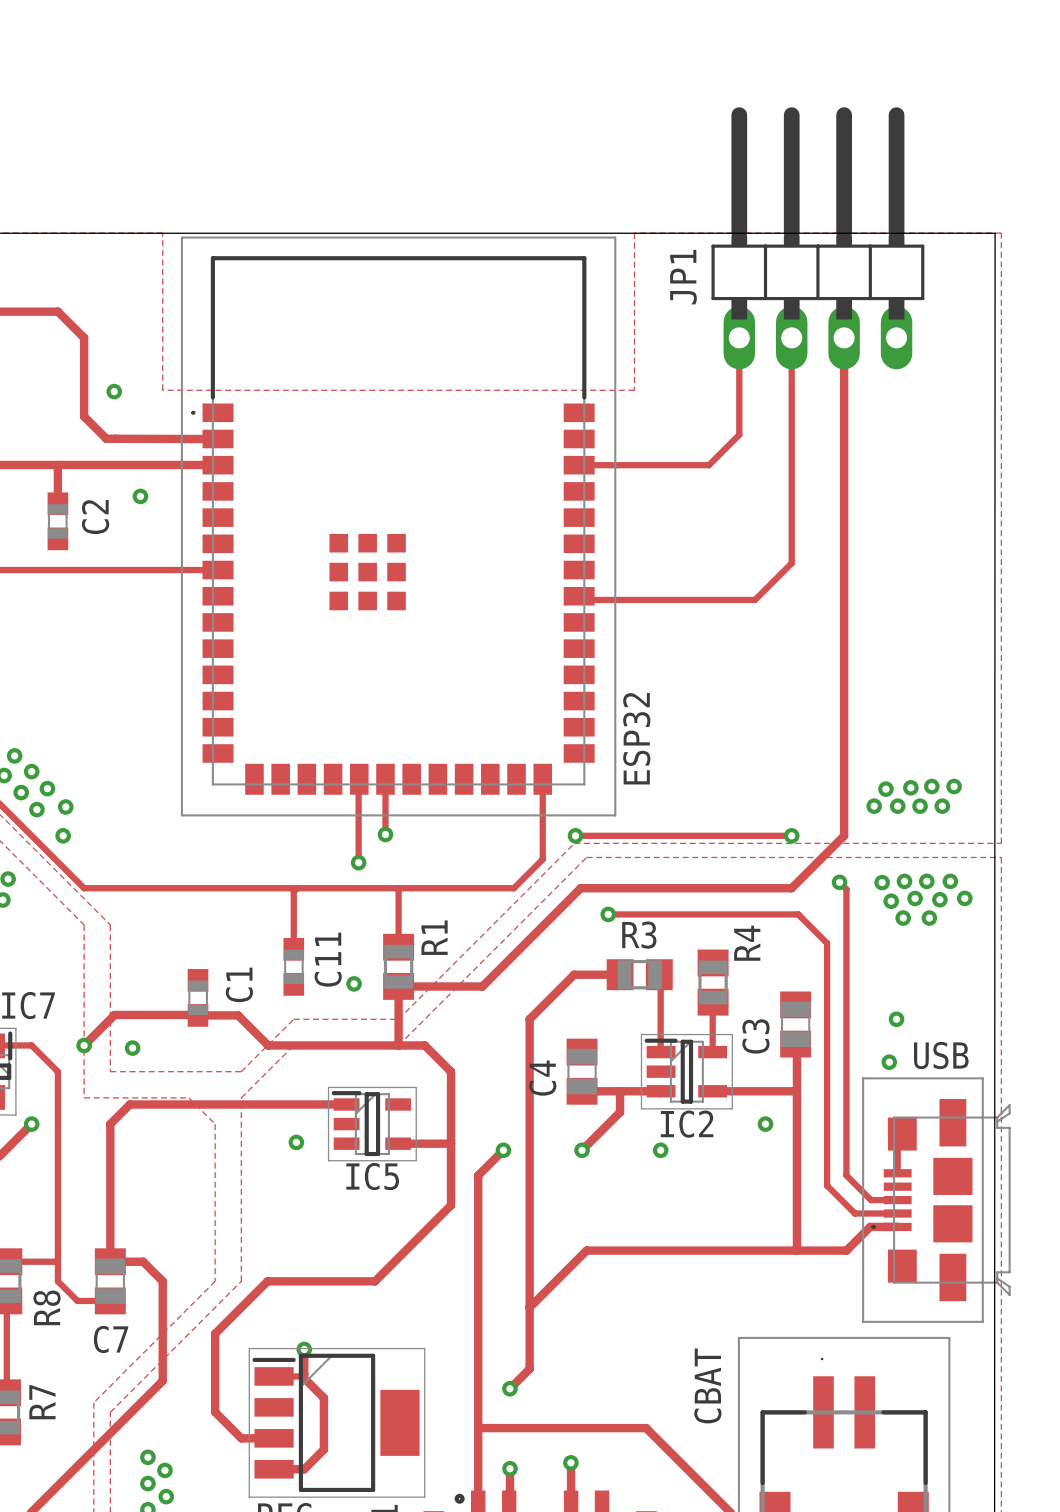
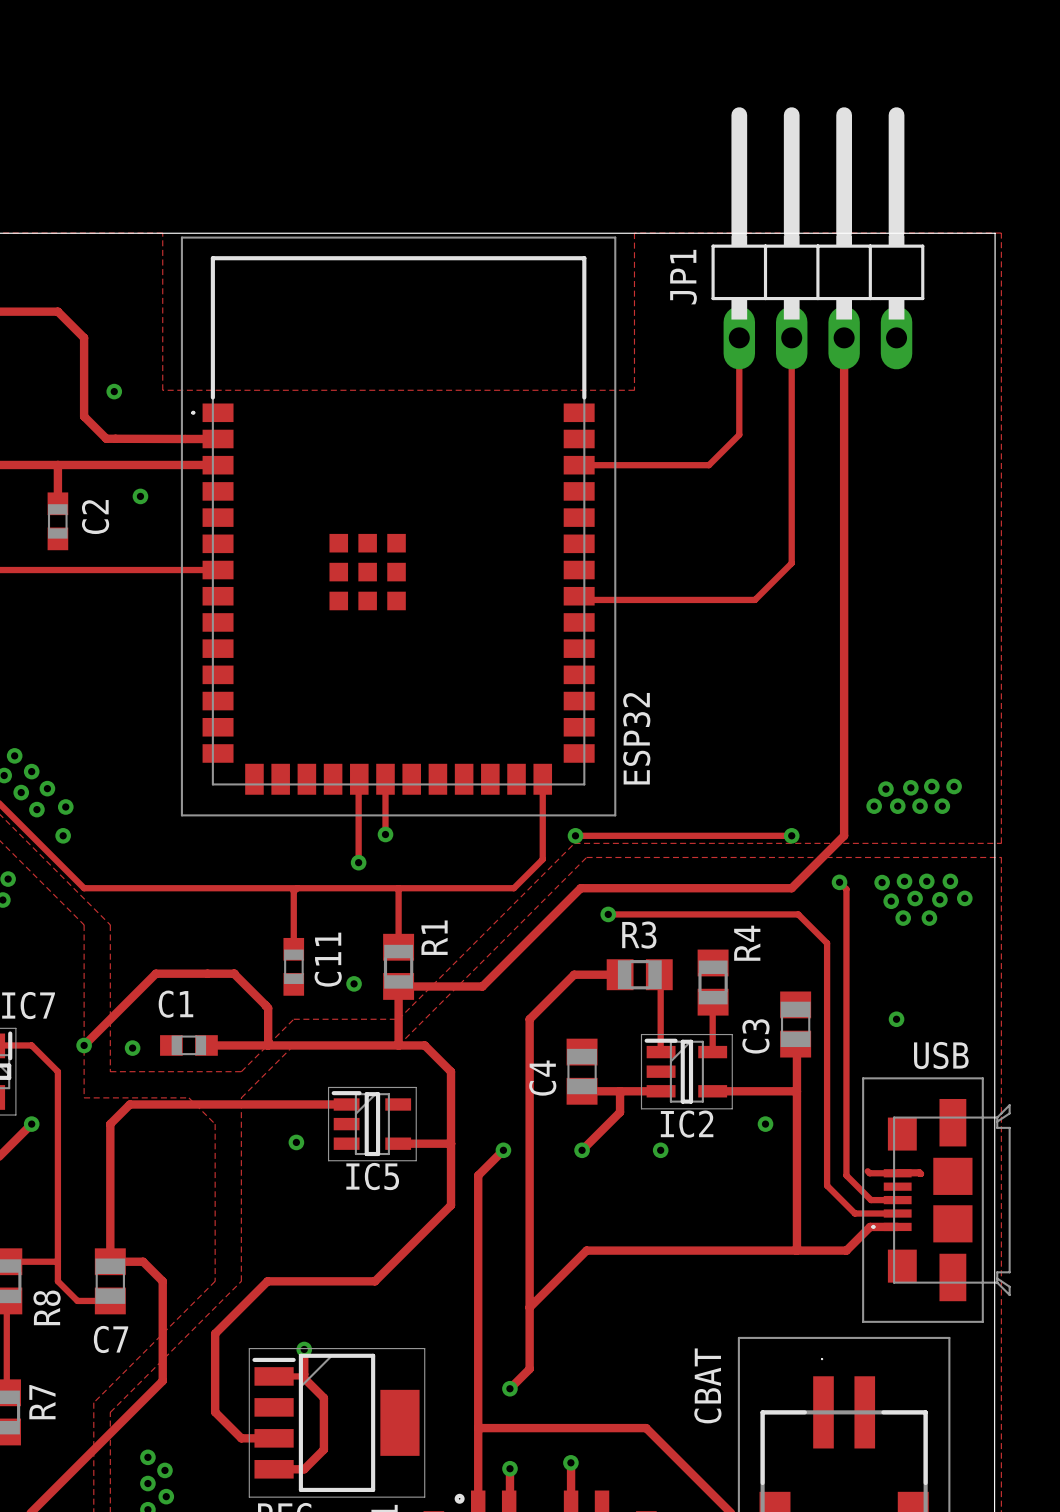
C1 name position: C1 (239, 984) -> C1 (175, 1004)
C1 rotation: 0° (198, 997) -> 90° clockwise (188, 1045)
C1 position: (198, 997) -> (188, 1045)
track: none -> (265, 1005) (268, 1008) (268, 1045) (206, 1045)
track: (114, 1014) (238, 1015) (268, 1045) -> (114, 1014) (155, 973) (234, 973) (265, 1005)
via: (889, 1062) -> none
track: (902, 1134) (897, 1138) (897, 1173) -> none
track: none -> (867, 1171) (869, 1173) (921, 1173) (898, 1172)

